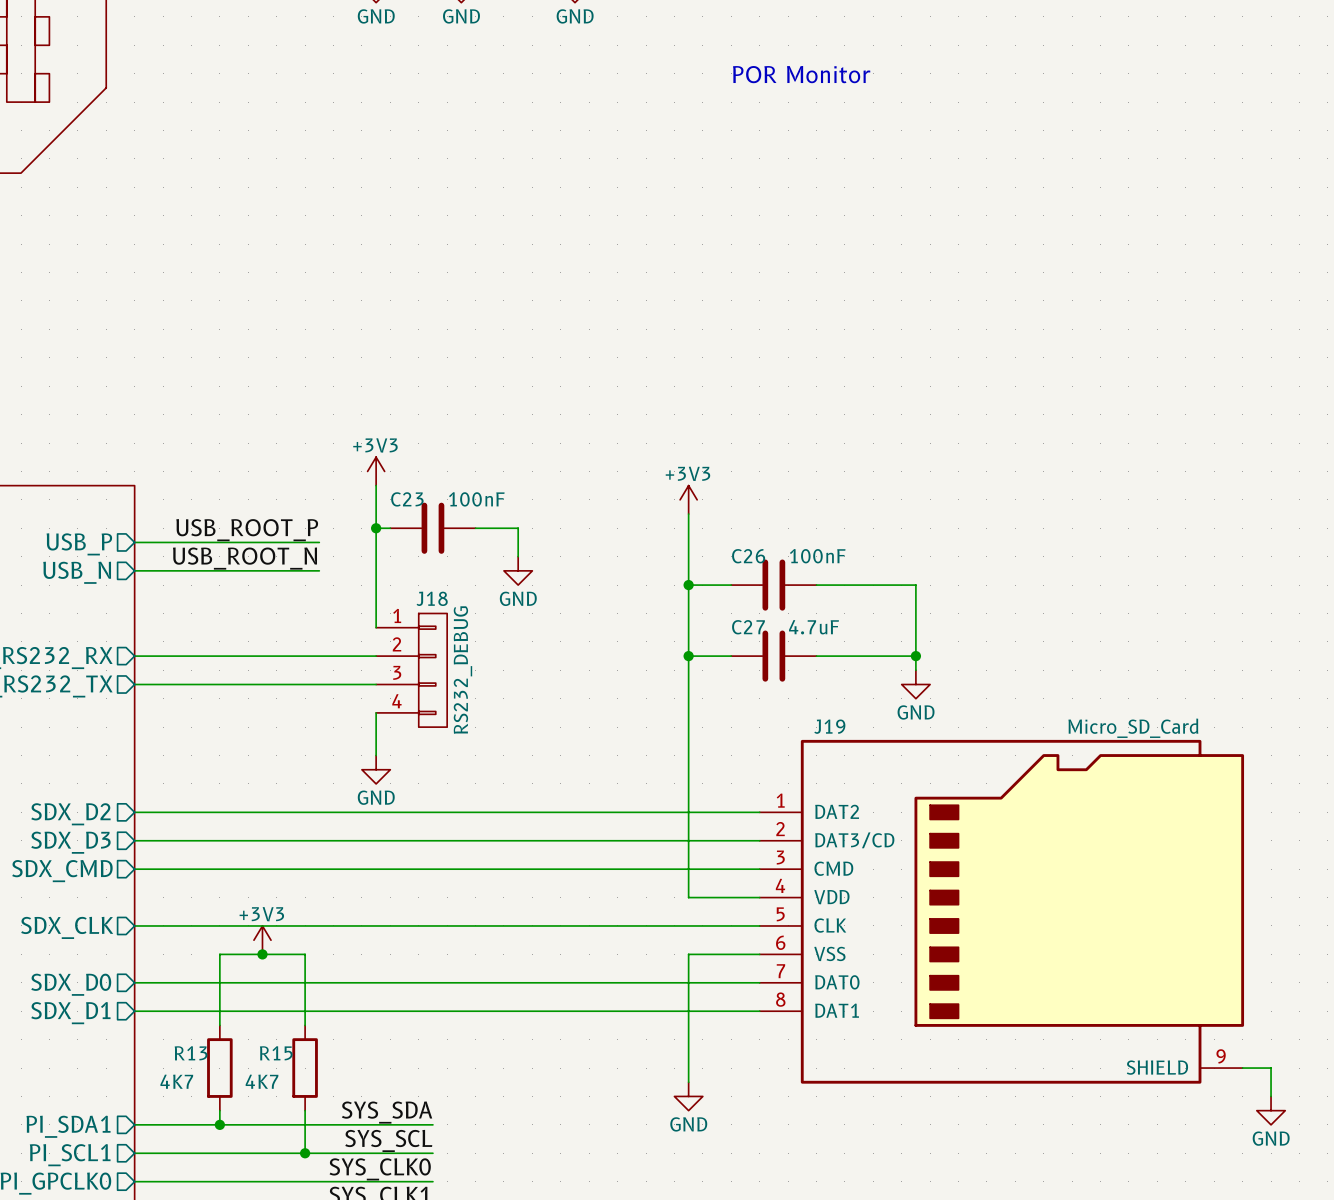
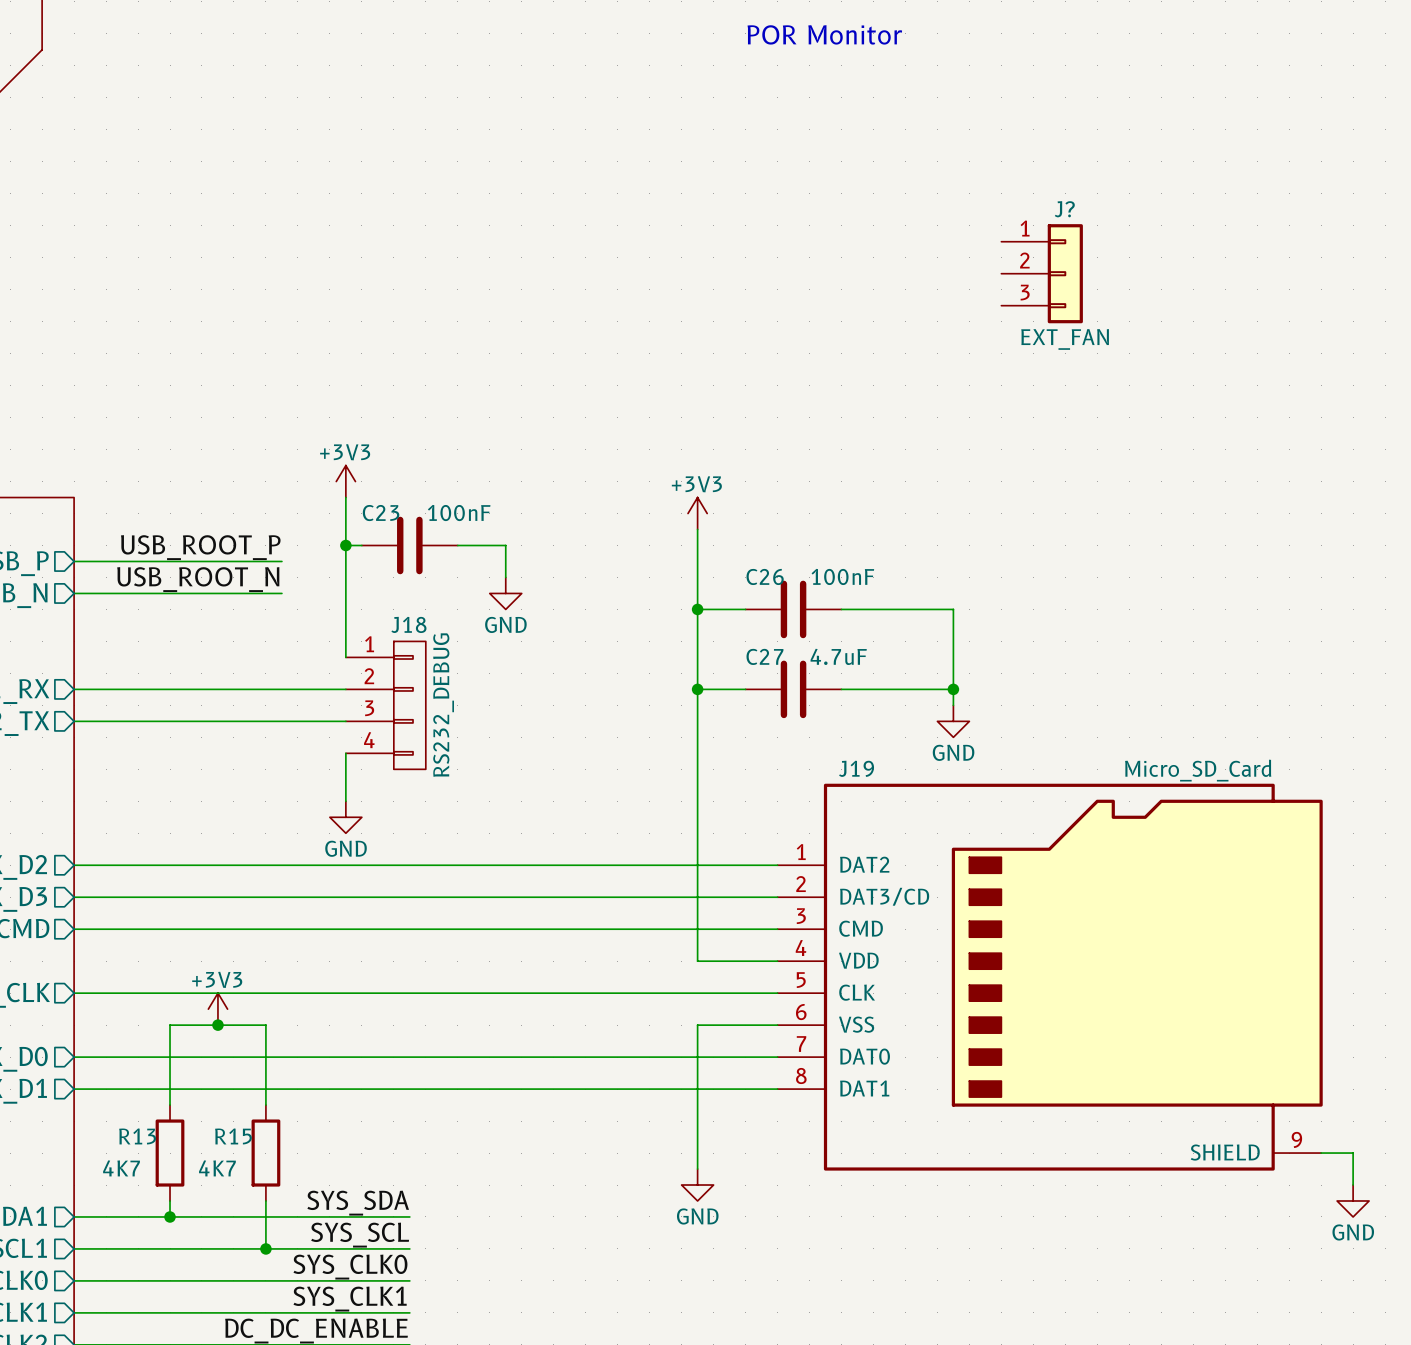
J?: none -> EXT_FAN (1042, 273)

